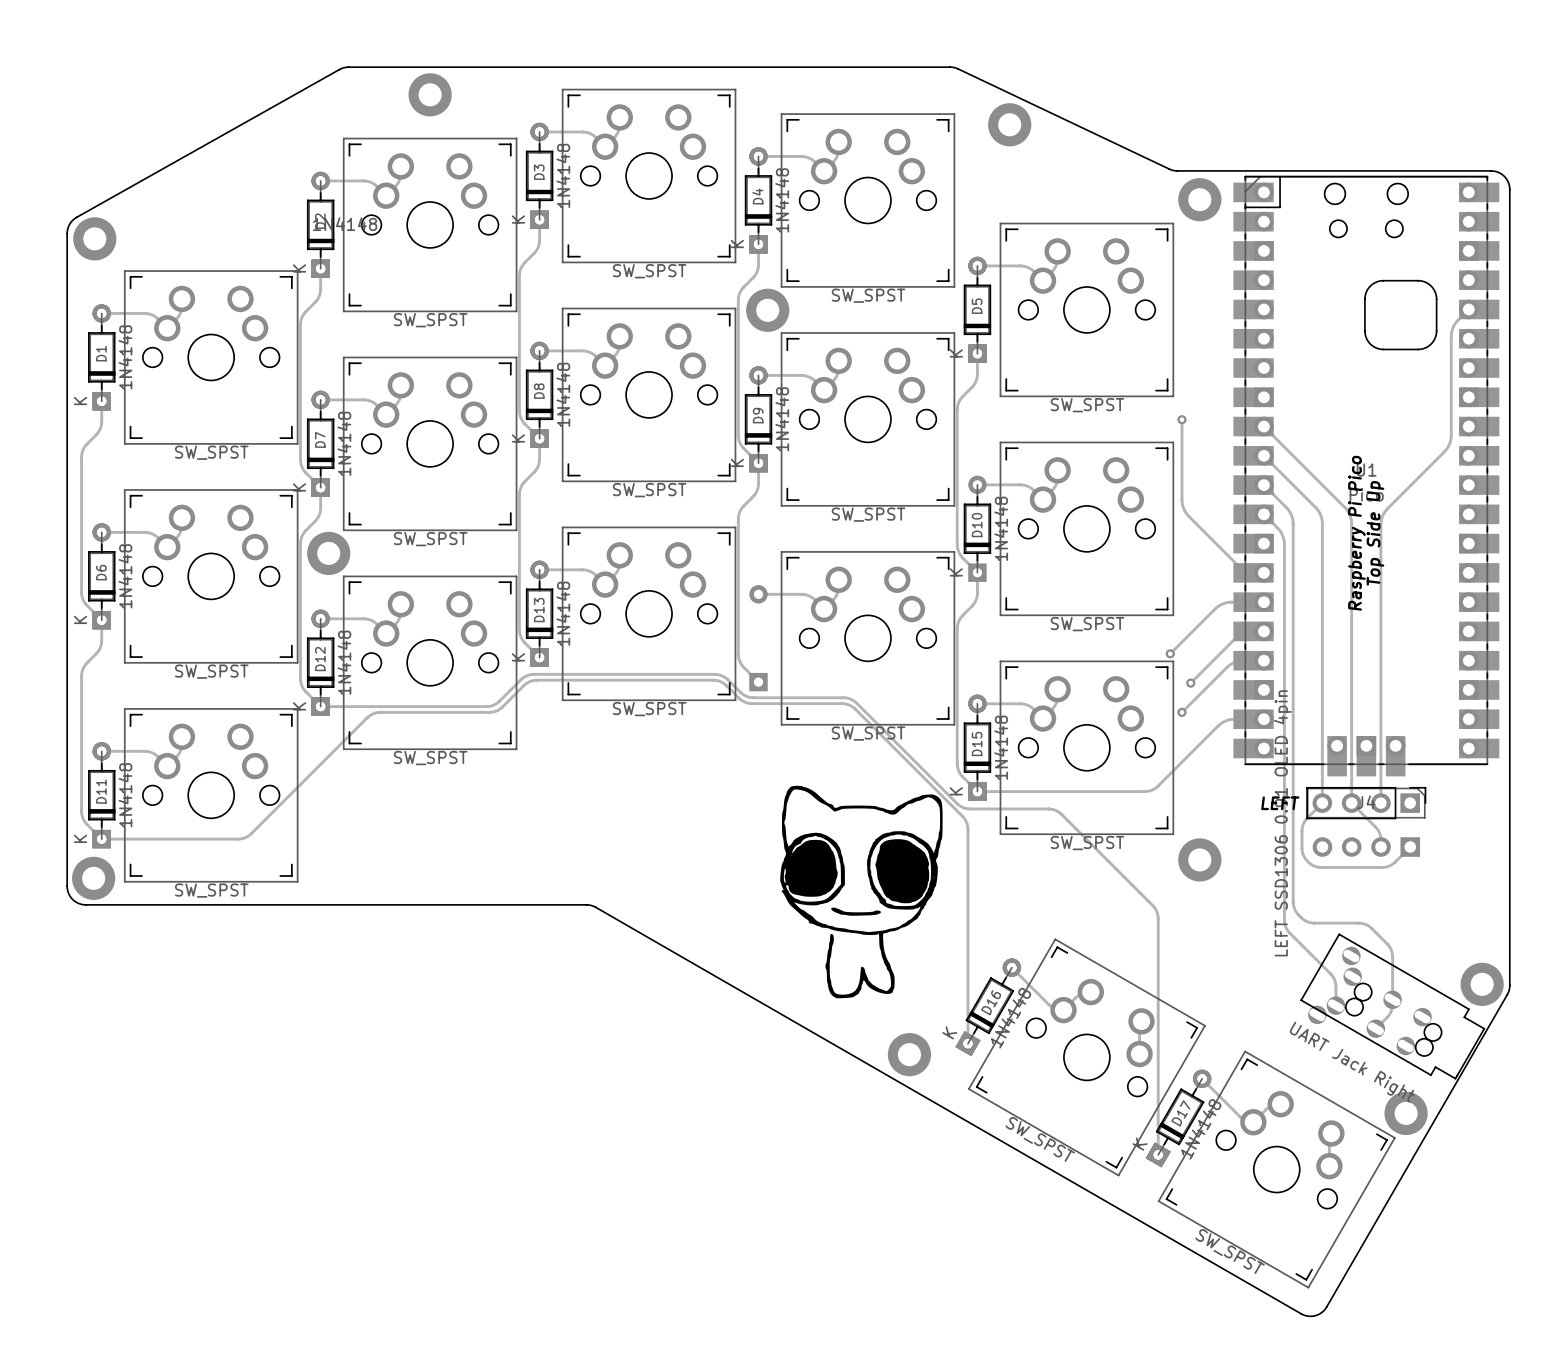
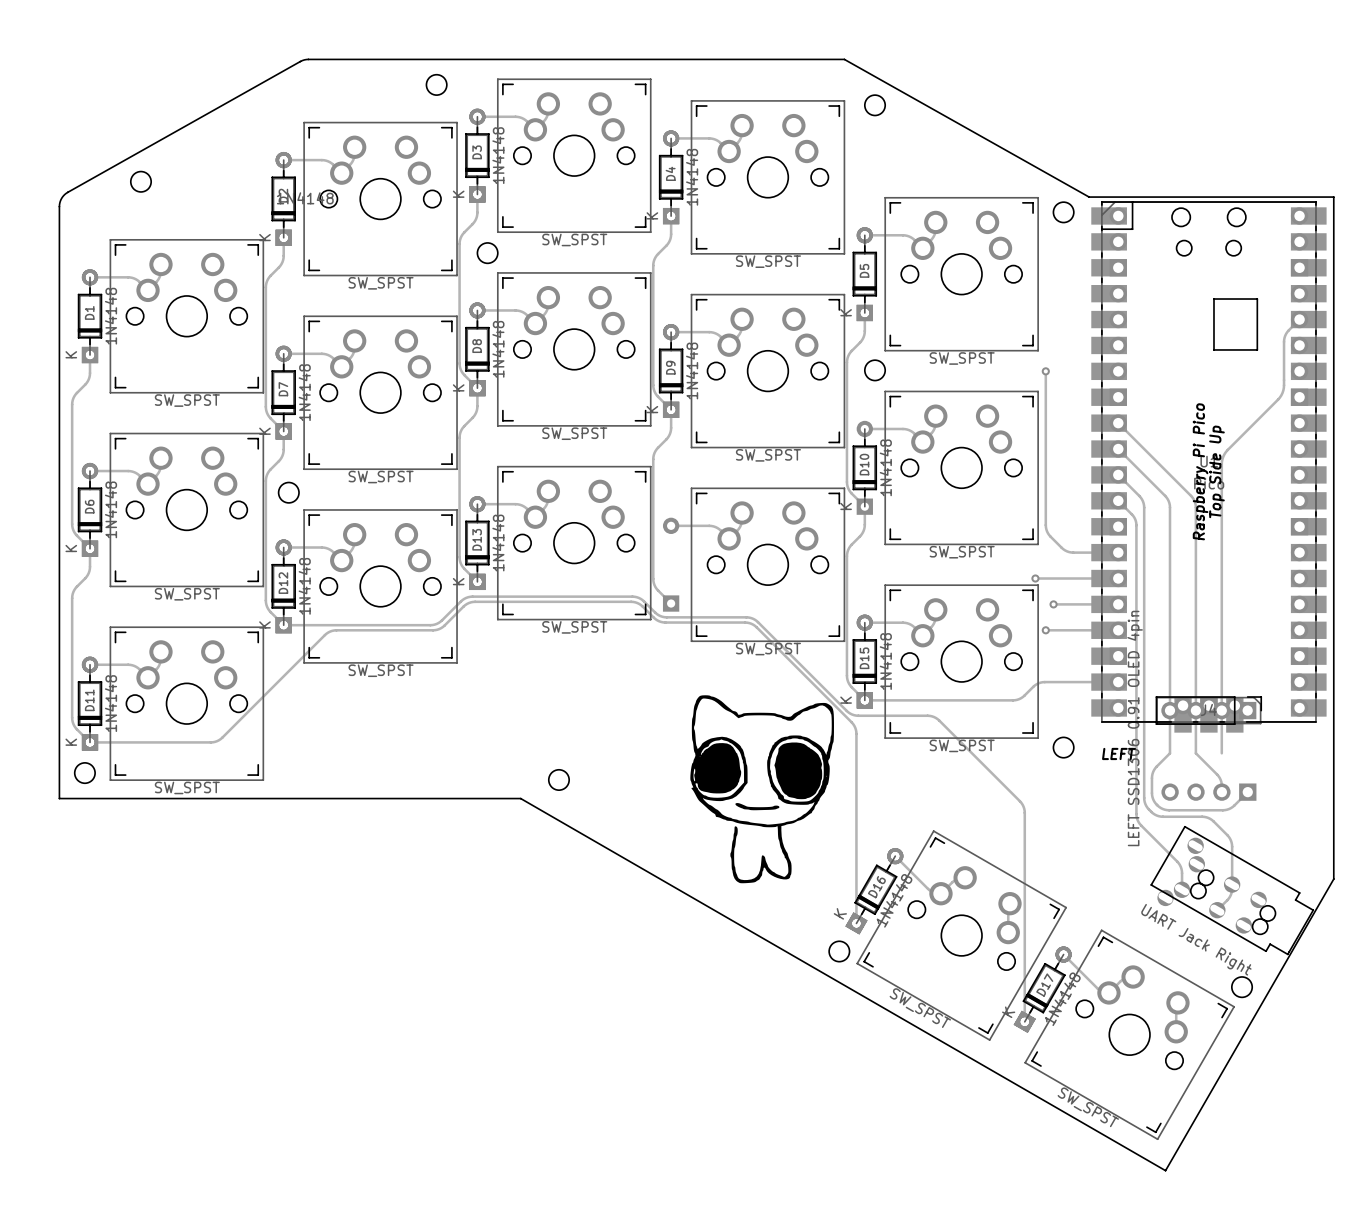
board edge: (950, 67) (958, 68) (1173, 170) (1491, 170) (1501, 173) (1508, 183) (1509, 988) (1323, 1310) (1313, 1316) (1301, 1313) (591, 905) (85, 904) (72, 899) (67, 886) -> (840, 59) (844, 59) (1089, 197) (1333, 197) (1333, 879) (1165, 1170) (520, 798) (59, 798) (59, 784)
round board edge: none -> [425, 74, 448, 96]
via: (430, 94) -> none
round board edge: none -> [864, 94, 886, 117]
via: (1009, 124) -> none
round board edge: none -> [130, 171, 152, 193]
via: (1199, 199) -> none
round board edge: none -> [1052, 201, 1075, 224]
via: (94, 238) -> none
round board edge: none -> [476, 242, 499, 264]
board edge: (1383, 280) (1422, 281) (1433, 289) (1436, 297) (1436, 332) (1433, 340) (1427, 346) (1420, 349) (1381, 349) (1373, 346) (1367, 340) (1364, 330) (1365, 295) (1371, 284) (1383, 280) -> none
track: (1468, 309) (1456, 321) (1451, 332) (1451, 386) -> (1299, 319) (1287, 331) (1284, 341)
via: (767, 310) -> none
board edge: none -> (1213, 299) (1257, 299) (1257, 349) (1213, 349) (1213, 299)
round board edge: none -> [864, 359, 886, 382]
track: (1263, 426) (1348, 512) (1351, 523) (1351, 573) -> (1118, 423) (1191, 495) (1195, 507)
track: (1263, 455) (1319, 512) (1322, 523) (1322, 573) -> (1118, 449) (1165, 495) (1169, 507)
U1 position: (1366, 476) -> (1208, 467)
track: (1263, 485) (1287, 509) (1292, 517) (1293, 573) -> (1118, 474) (1140, 497) (1144, 507)
track: (1181, 499) (1187, 514) (1238, 566) (1248, 572) (1263, 572) -> (1045, 442) (1045, 525) (1048, 533) (1061, 547) (1069, 552) (1118, 552)
track: (1263, 514) (1279, 529) (1283, 537) (1284, 593) -> (1118, 500) (1133, 515) (1136, 525)
round board edge: none -> [278, 482, 300, 504]
via: (328, 553) -> none
track: (1263, 602) (1228, 602) (1220, 605) (1170, 653) -> (1118, 578) (1035, 578)
track: (1263, 631) (1249, 631) (1237, 636) (1190, 683) -> (1118, 604) (1053, 604)
track: (1263, 660) (1240, 660) (1231, 663) (1181, 712) -> (1118, 630) (1045, 630)
track: (1263, 719) (1231, 719) (1222, 722) (1167, 776) -> (1118, 682) (1044, 682) (1033, 686)
text position: LEFT (1280, 803) -> LEFT (1119, 753)
track: (1322, 803) (1305, 819) (1302, 826) (1302, 850) (1307, 861) -> (1169, 710) (1169, 753) (1155, 768) (1152, 775) (1152, 795) (1156, 804) (1166, 810) (1225, 810) (1232, 806) (1247, 792)
track: (1351, 803) (1377, 828) (1380, 835) (1381, 847) -> (1195, 710) (1195, 753) (1218, 776) (1221, 781) (1221, 792)
track: none -> (1221, 710) (1221, 753)
round board edge: none -> [1052, 736, 1075, 759]
part position: (1366, 847) -> (1208, 792)
track: (1410, 847) (1393, 863) (1384, 867) (1318, 867) (1308, 862) -> none
via: (1199, 859) -> none
round board edge: none -> [74, 762, 96, 784]
round board edge: none -> [548, 769, 570, 791]
via: (93, 878) -> none
via: (1482, 984) -> none
via: (909, 1054) -> none
round board edge: none -> [828, 940, 851, 963]
round board edge: none -> [1231, 976, 1253, 998]
via: (1406, 1113) -> none

